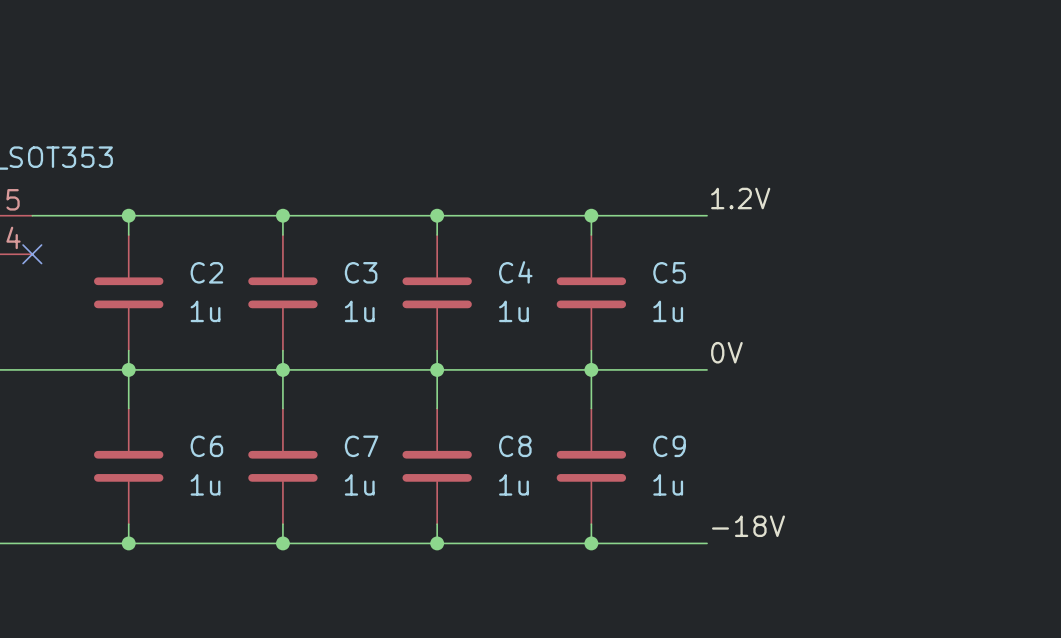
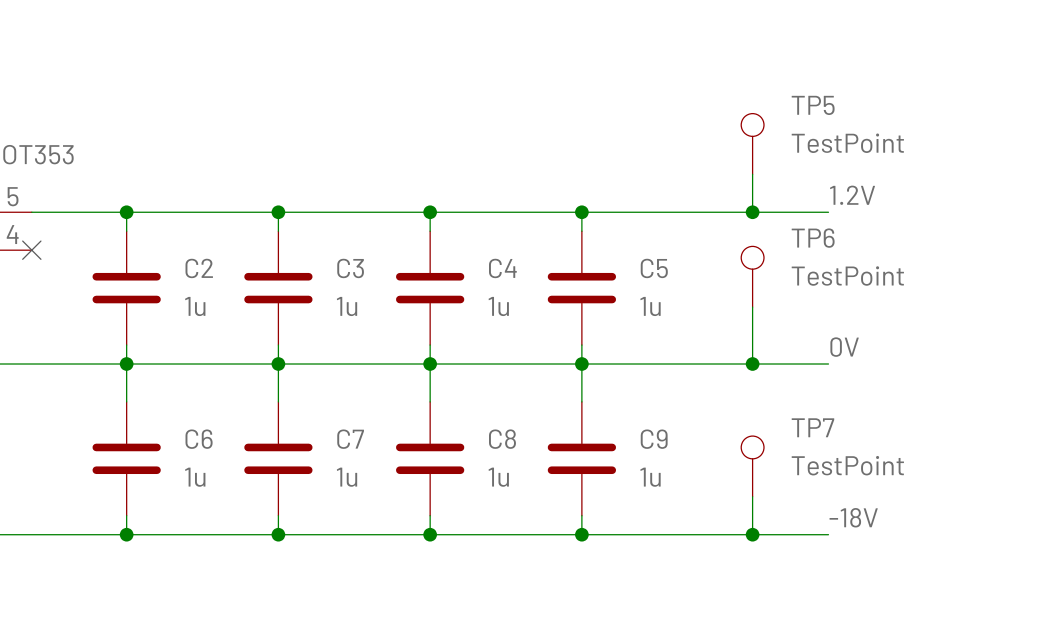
TP5: none -> TestPoint (752, 143)
wire: none -> (752, 174) (752, 212)
label position: 1.2V (740, 198) -> 1.2V (852, 195)
wire: none -> (695, 212) (828, 212)
junction: none -> (752, 212)
TP6: none -> TestPoint (752, 276)
wire: none -> (752, 307) (752, 364)
label position: 0V (726, 352) -> 0V (844, 347)
wire: none -> (695, 364) (828, 364)
junction: none -> (752, 364)
TP7: none -> TestPoint (752, 466)
wire: none -> (752, 496) (752, 534)
label position: -18V (748, 526) -> -18V (853, 517)
wire: none -> (695, 534) (828, 534)
junction: none -> (752, 534)

